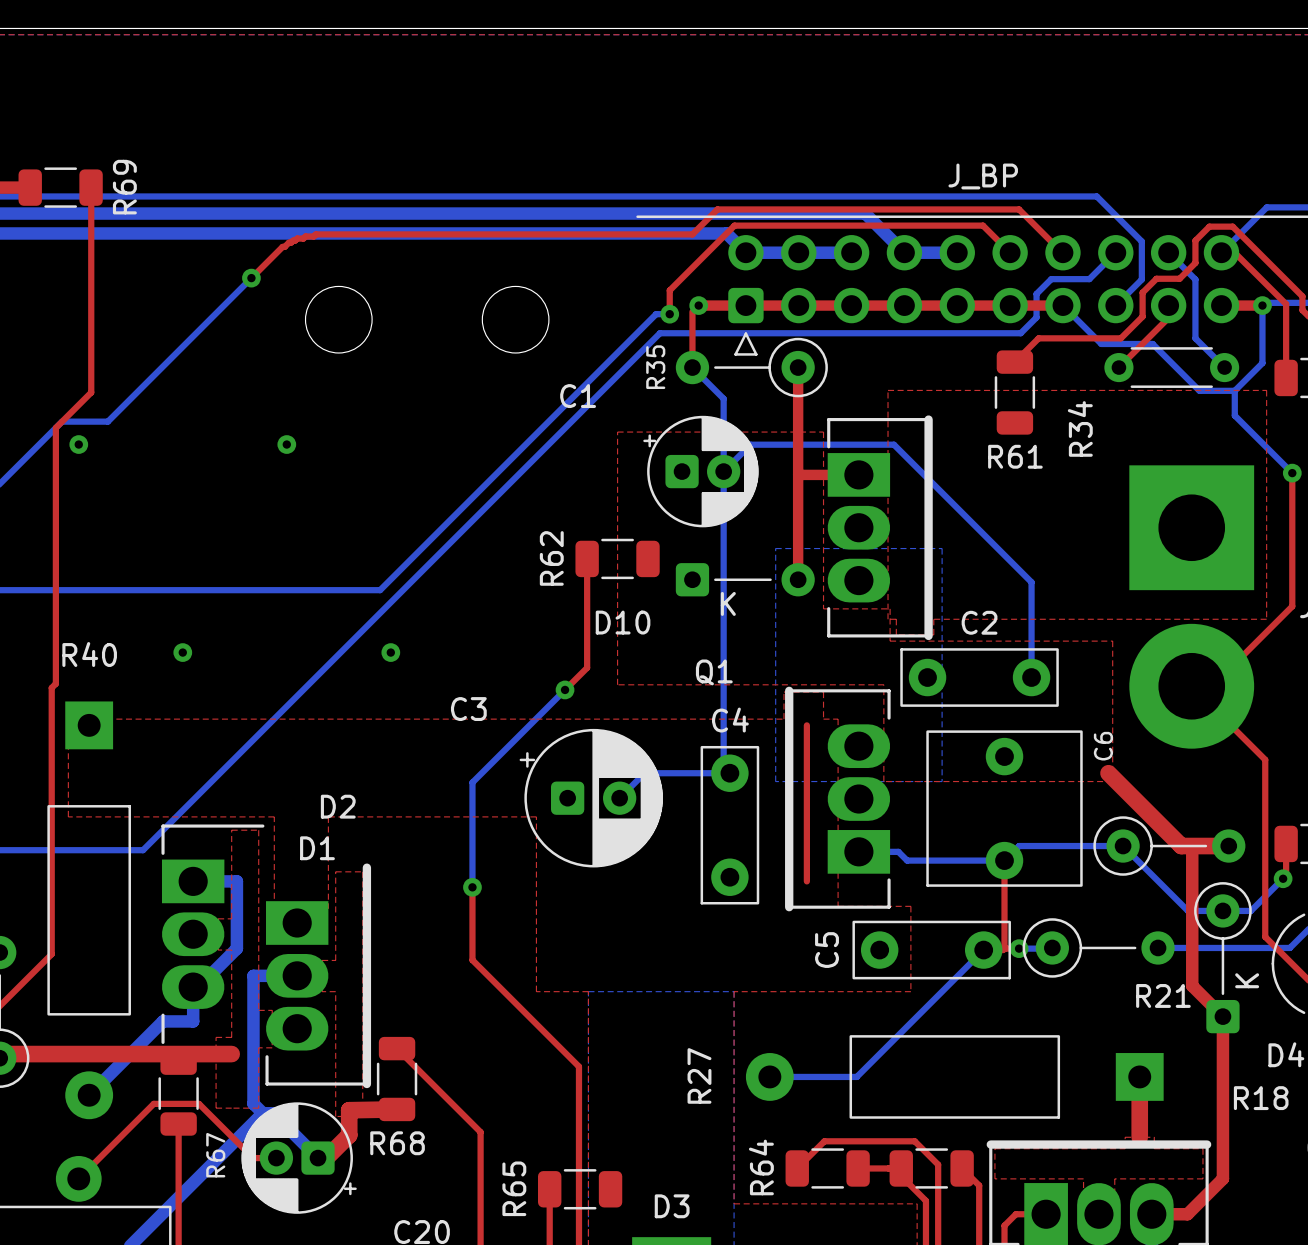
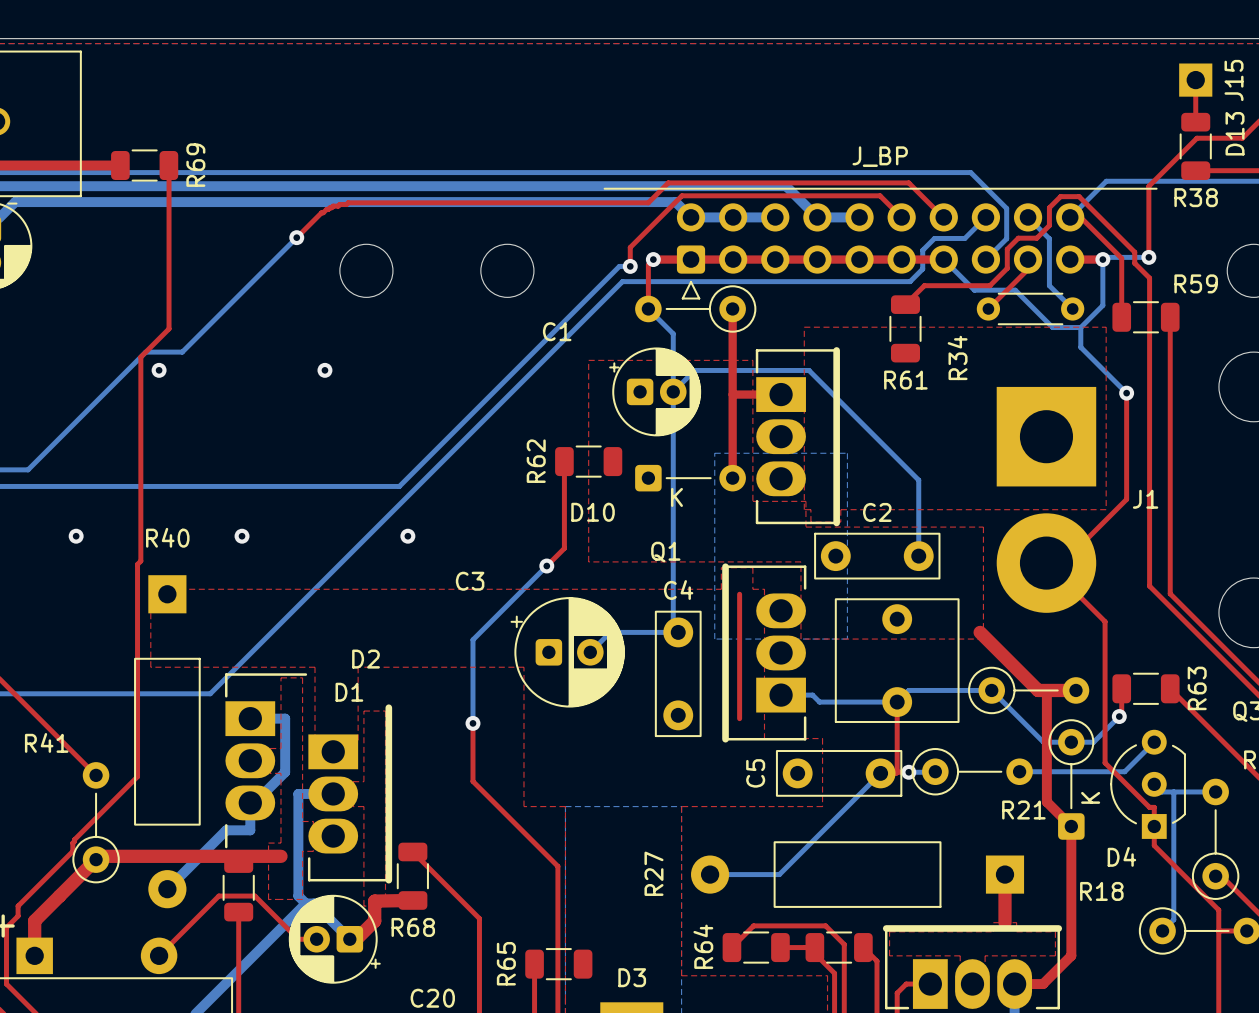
R35 name: R35 (655, 367) -> none
C6 name: C6 (1103, 746) -> none
R67 name: R67 (215, 1155) -> none

